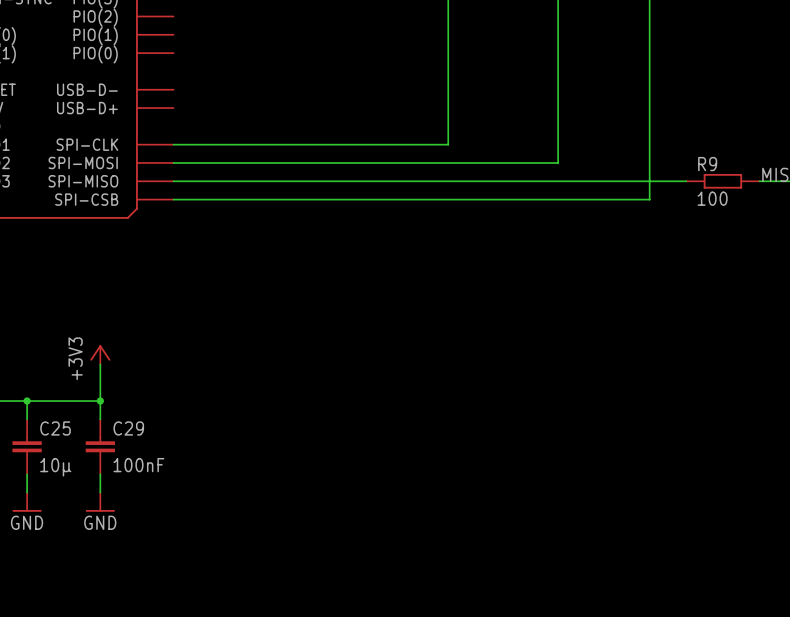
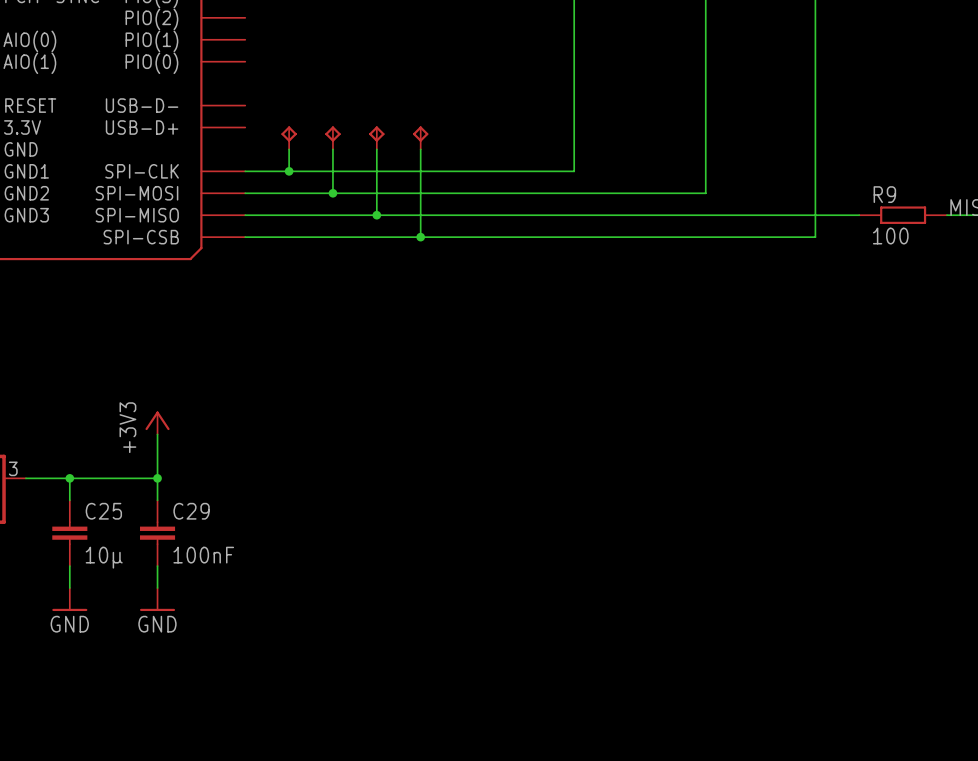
part: none -> (289, 137)
part: none -> (332, 137)
part: none -> (376, 137)
part: none -> (420, 137)
wire: none -> (289, 149) (289, 171)
wire: none -> (332, 149) (332, 193)
wire: none -> (376, 149) (376, 215)
wire: none -> (420, 149) (420, 237)
junction: none -> (289, 171)
junction: none -> (332, 193)
junction: none -> (376, 215)
junction: none -> (420, 237)

